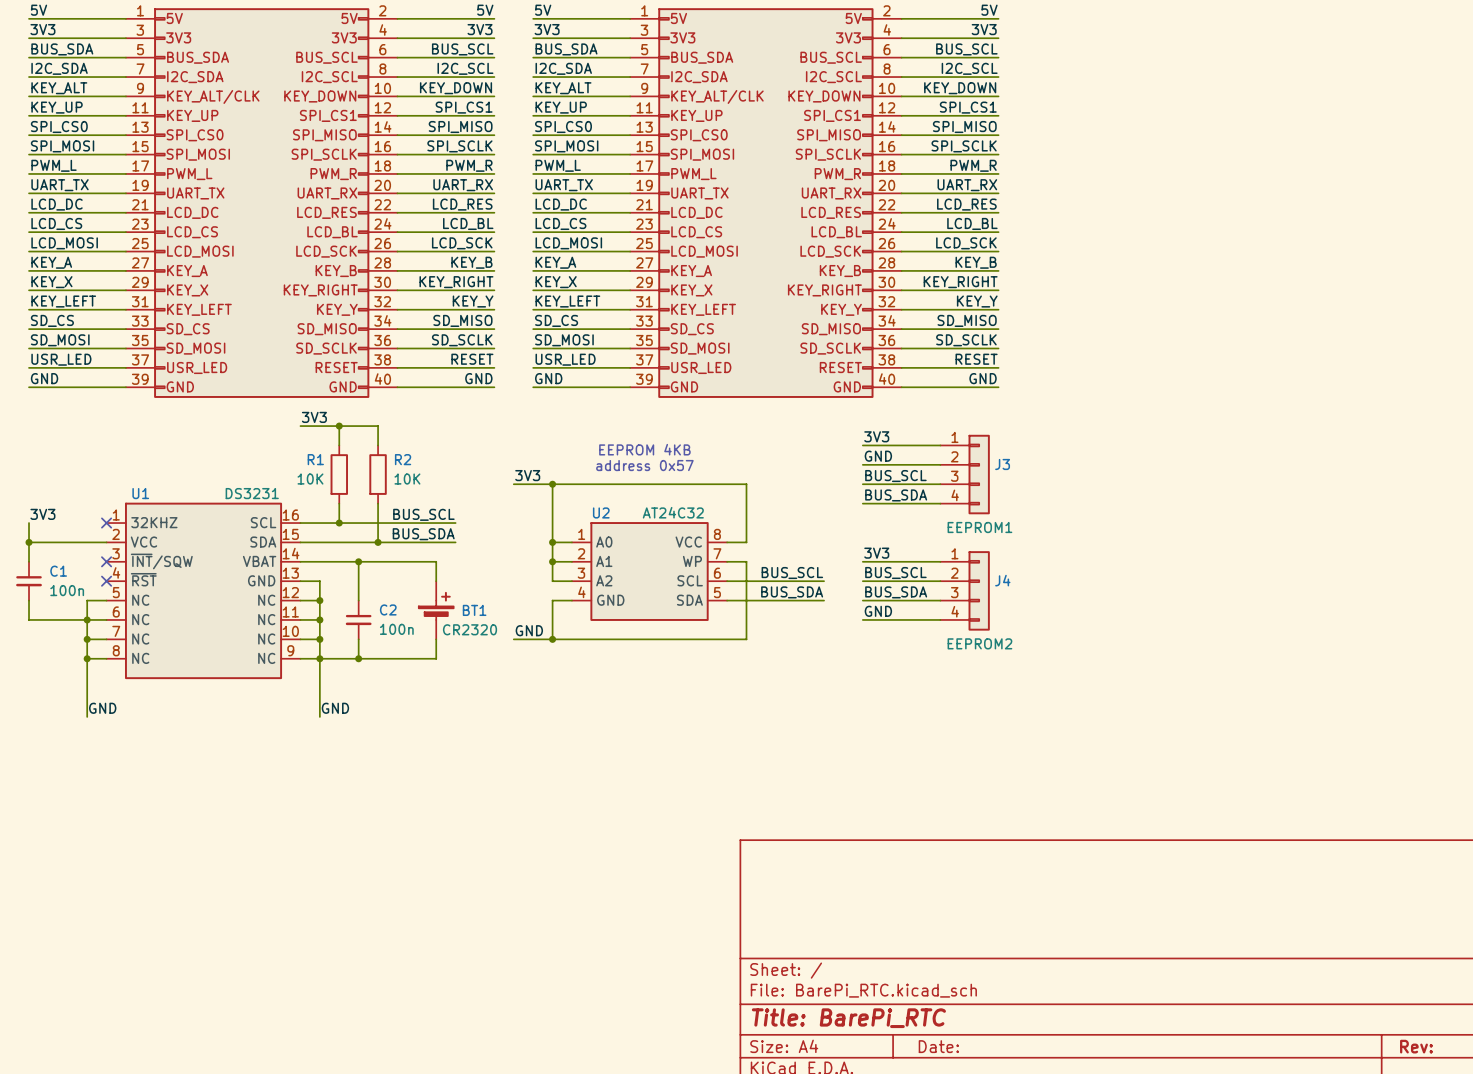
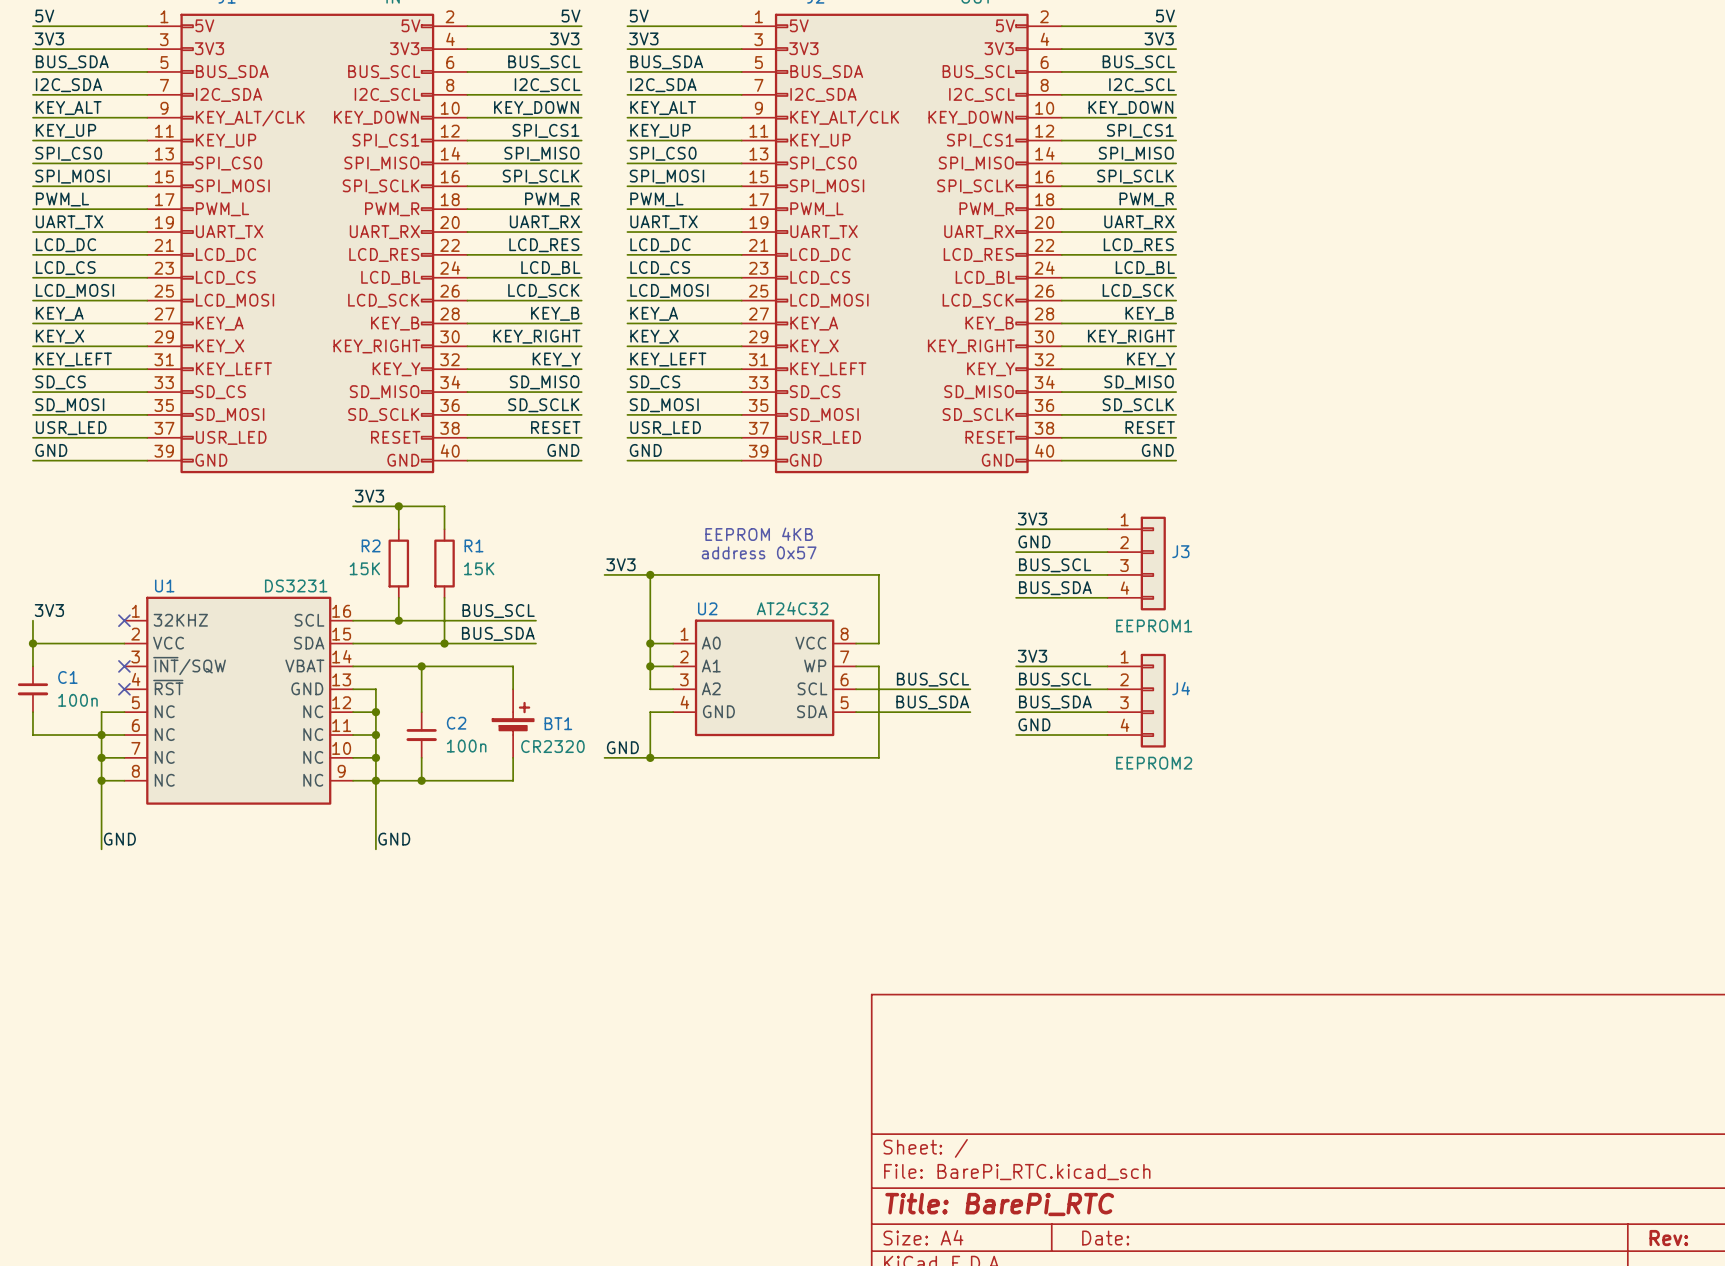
R1 name: R1 (315, 459) -> R2 (371, 545)
R2 name: R2 (403, 459) -> R1 (474, 545)
R1 value: 10K (310, 479) -> 15K (364, 568)
R2 value: 10K (407, 479) -> 15K (479, 568)

